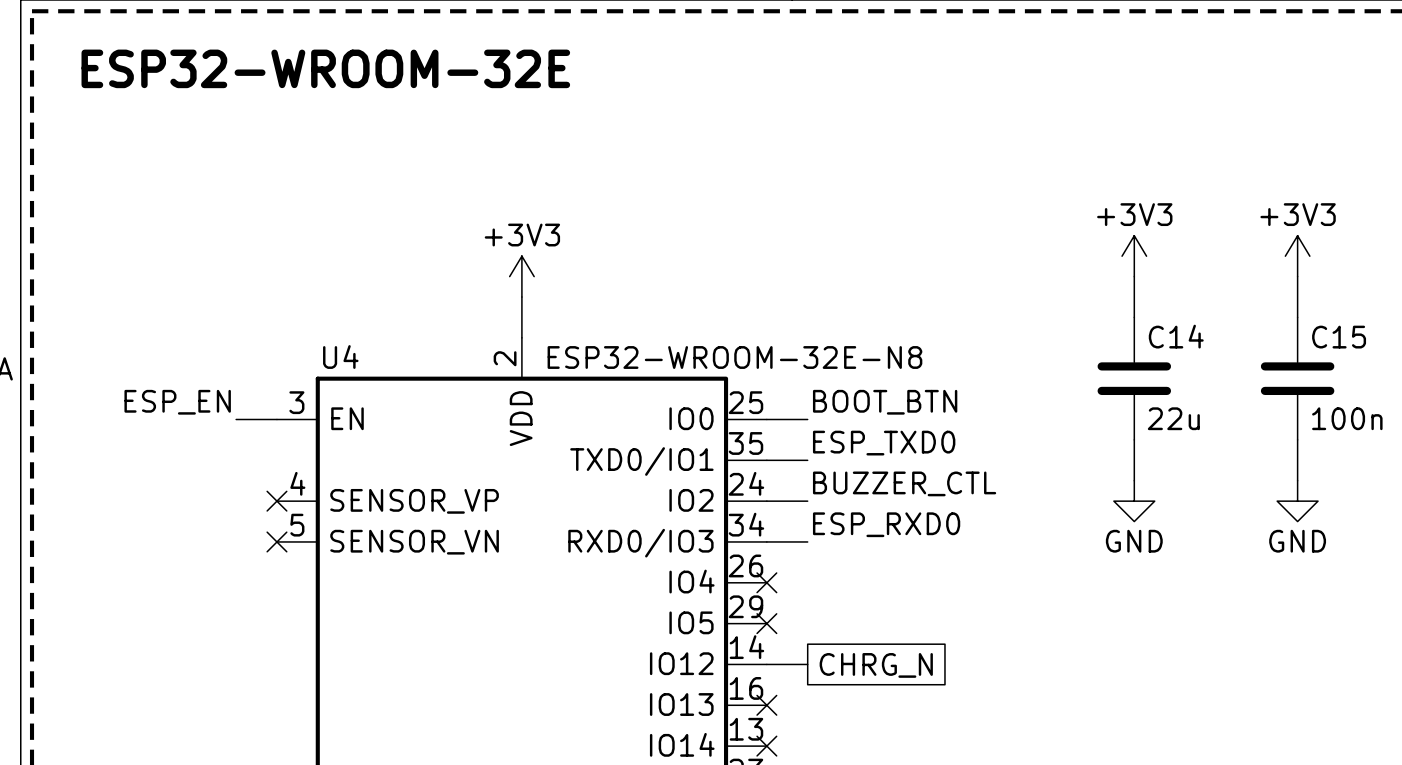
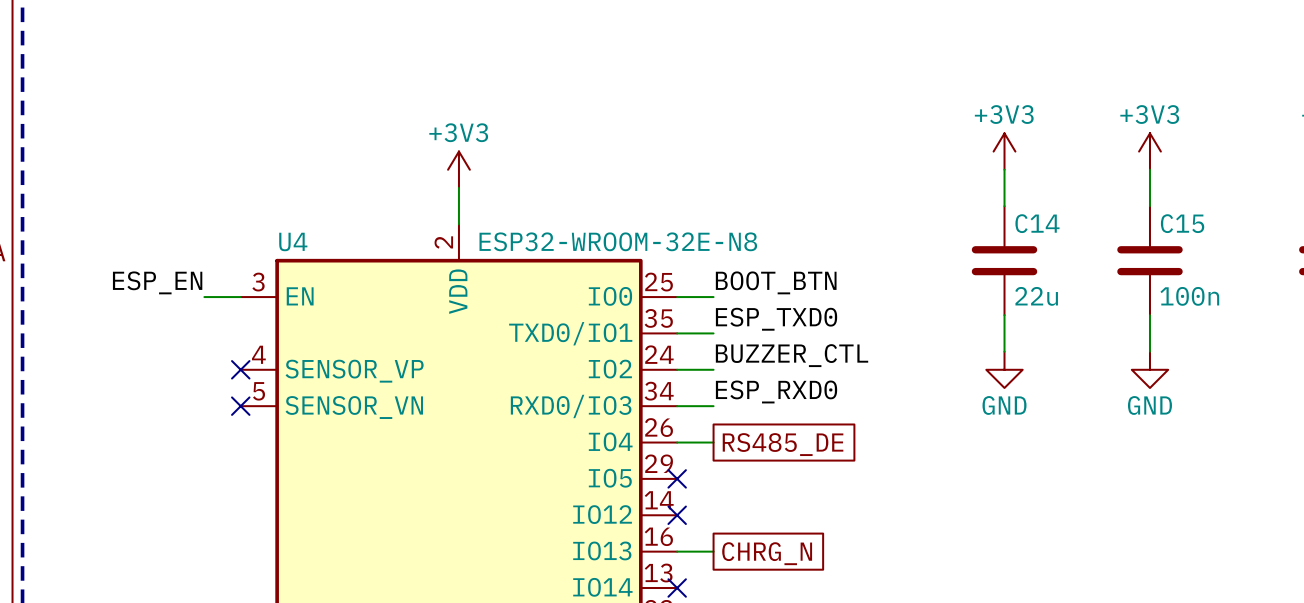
wire: none -> (677, 442) (713, 442)
no-connect mark: (766, 582) -> none
global label: none -> RS485_DE (783, 444)
wire: (766, 664) (807, 664) -> (677, 551) (713, 551)
no-connect mark: none -> (677, 515)
global label position: CHRG_N (876, 665) -> CHRG_N (767, 553)
no-connect mark: (766, 705) -> none

